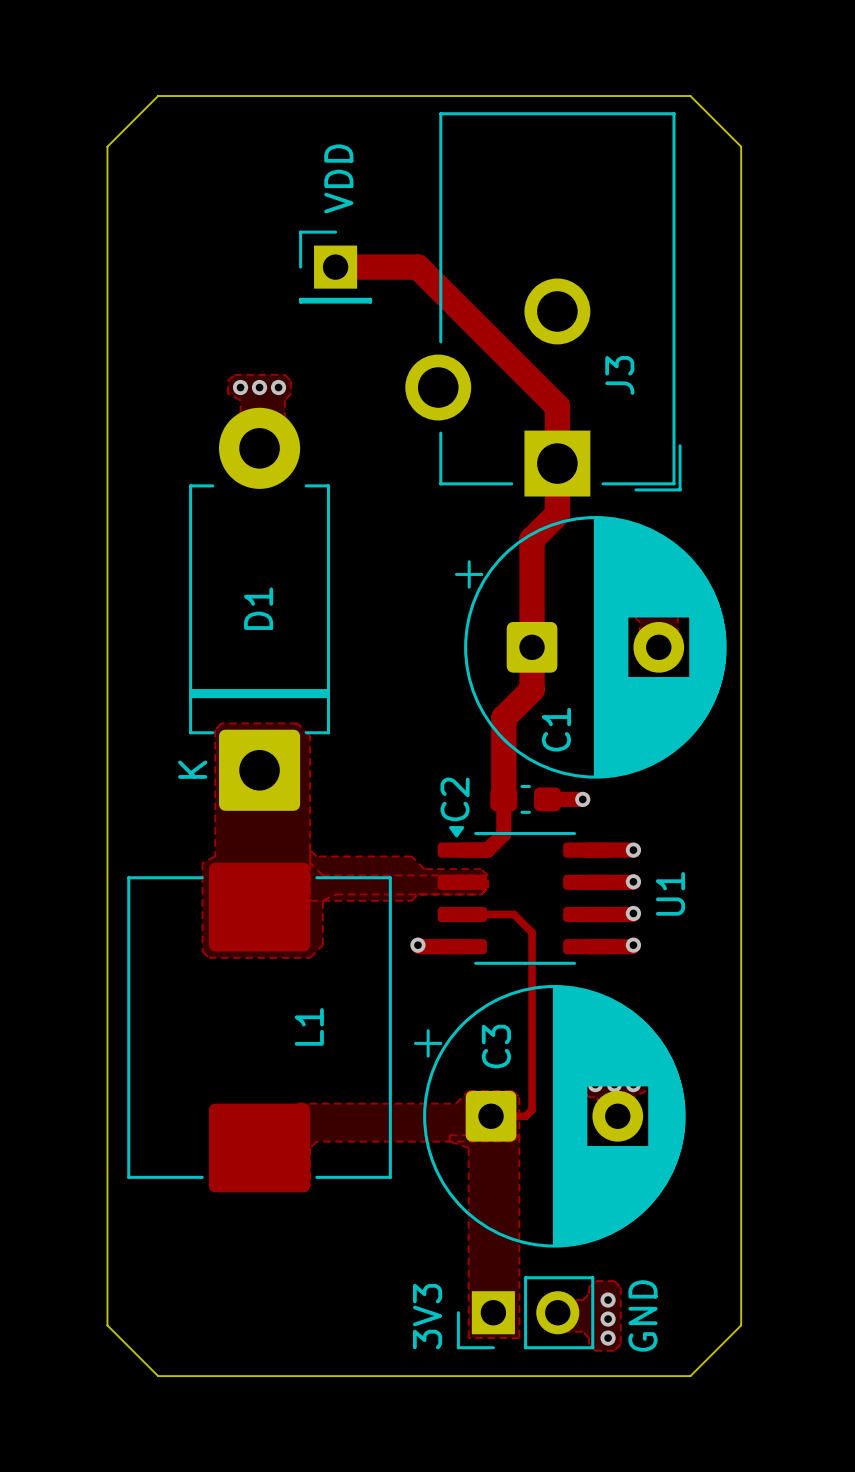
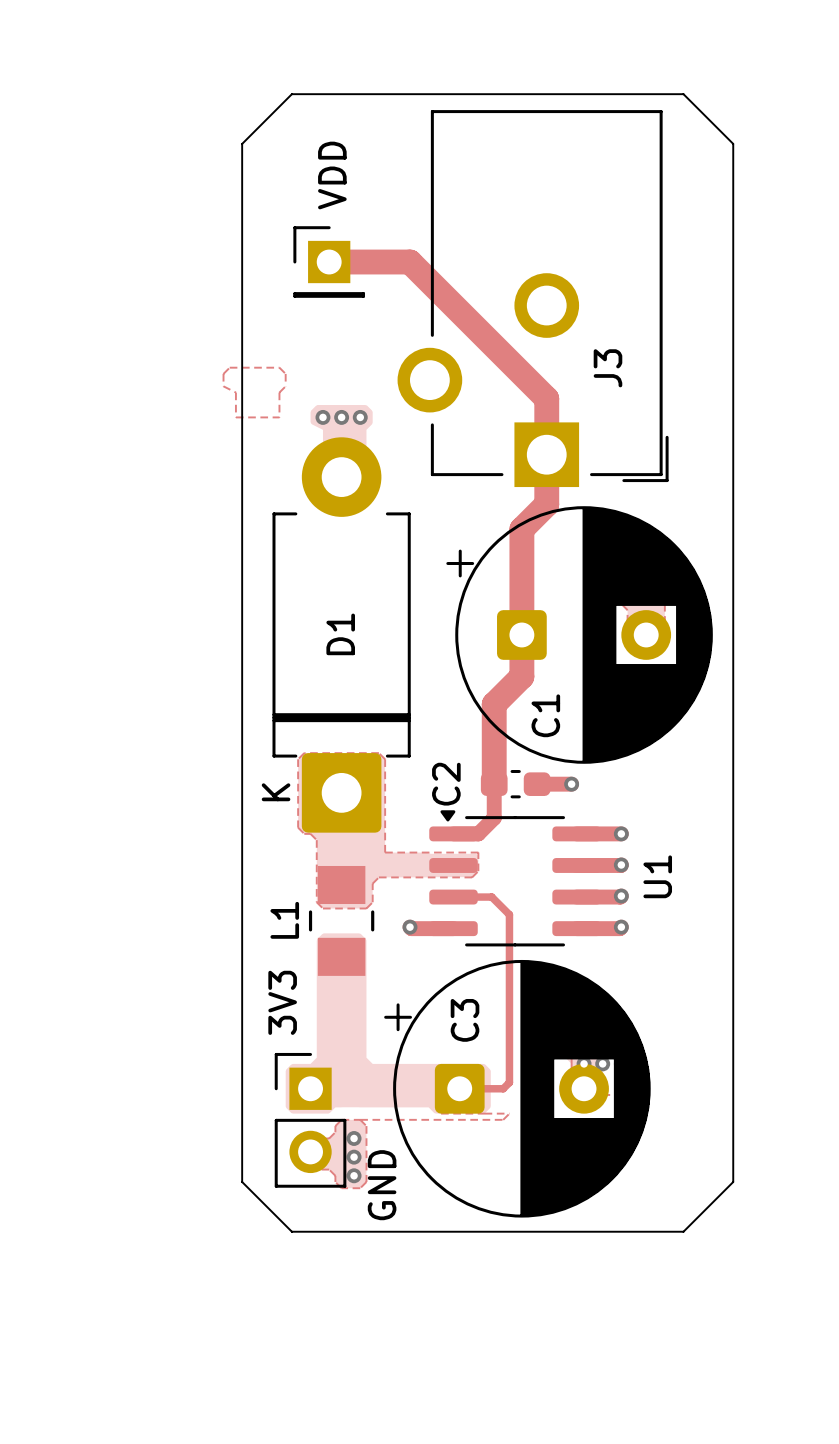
board edge: (297, 96) (158, 96) (107, 146) (107, 1325) (158, 1376) (690, 1376) (741, 1325) (741, 146) (690, 96) -> (291, 94) (242, 143) (242, 1182) (291, 1231) (683, 1231) (733, 1182) (733, 143) (683, 94) (677, 94)
via: (240, 387) -> none
via: (259, 387) -> none
via: (278, 387) -> none
via: none -> (322, 417)
via: none -> (341, 417)
via: none -> (360, 417)
D1 position: (259, 609) -> (341, 634)
zone outline: (310, 850) (316, 856) (411, 856) (424, 869) -> (316, 883) (316, 840) (310, 833) (304, 833) (298, 827) (298, 759) (304, 753) (378, 753) (385, 759) (385, 852) (416, 852)
L1 footprint: [127, 862, 392, 1193] -> [308, 865, 375, 976]
zone outline: (310, 862) (322, 875) (487, 875) (481, 869) -> (478, 858) (478, 852) (472, 852)
zone outline: (386, 894) (335, 894) (322, 900) -> (378, 877) (372, 883) (372, 902) (366, 908) (322, 908) (316, 902)
zone outline: (417, 894) (411, 900) (310, 900) (310, 736) (297, 723) (221, 723) (215, 729) (215, 856) (202, 862) (202, 951) (208, 957) (310, 957) (322, 945) (322, 919) -> none
track: (501, 914) (514, 914) (532, 932) (532, 1109) (525, 1116) (491, 1116) -> (491, 897) (509, 914) (509, 1082) (503, 1088) (459, 1088)
L1 name position: L1 (309, 1026) -> L1 (284, 920)
C3 position: (549, 1116) -> (517, 1088)
zone outline: (449, 1135) (449, 1141) (468, 1147) (468, 1338) (519, 1338) (519, 1097) (513, 1090) (468, 1090) (456, 1103) (297, 1103) (297, 1185) (310, 1185) (310, 1147) (316, 1141) (348, 1141) -> (360, 1119) (366, 1126) (366, 1182) (360, 1188) (341, 1188) (335, 1182) (335, 1175) (329, 1169) (310, 1169) (310, 1138) (329, 1138) (335, 1132) (335, 1126) (341, 1119)
via: none -> (354, 1138)
via: none -> (354, 1157)
via: none -> (354, 1175)
zone outline: (595, 1281) (589, 1287) (589, 1293) (582, 1300) (563, 1300) (563, 1331) (582, 1331) (589, 1338) (589, 1344) (595, 1350) (614, 1350) (620, 1344) (620, 1287) (614, 1281) (595, 1281) -> none
via: (608, 1300) -> none
part rotation: 0° (525, 1312) -> 90° clockwise (310, 1120)
part position: (525, 1312) -> (310, 1120)
text position: GND (643, 1315) -> GND (382, 1185)
text position: 3V3 (427, 1316) -> 3V3 (282, 1002)
via: (608, 1319) -> none
via: (608, 1338) -> none

